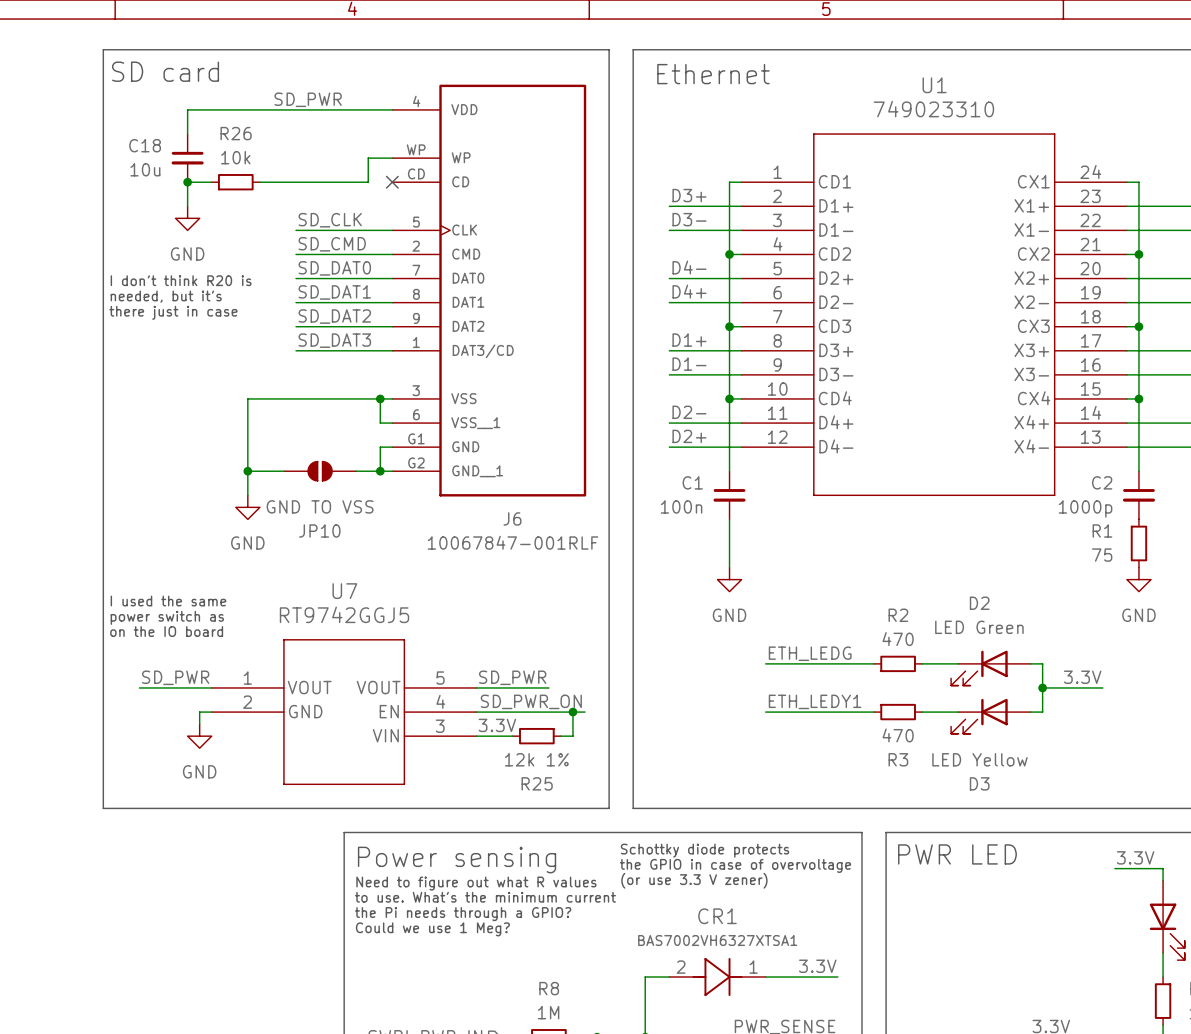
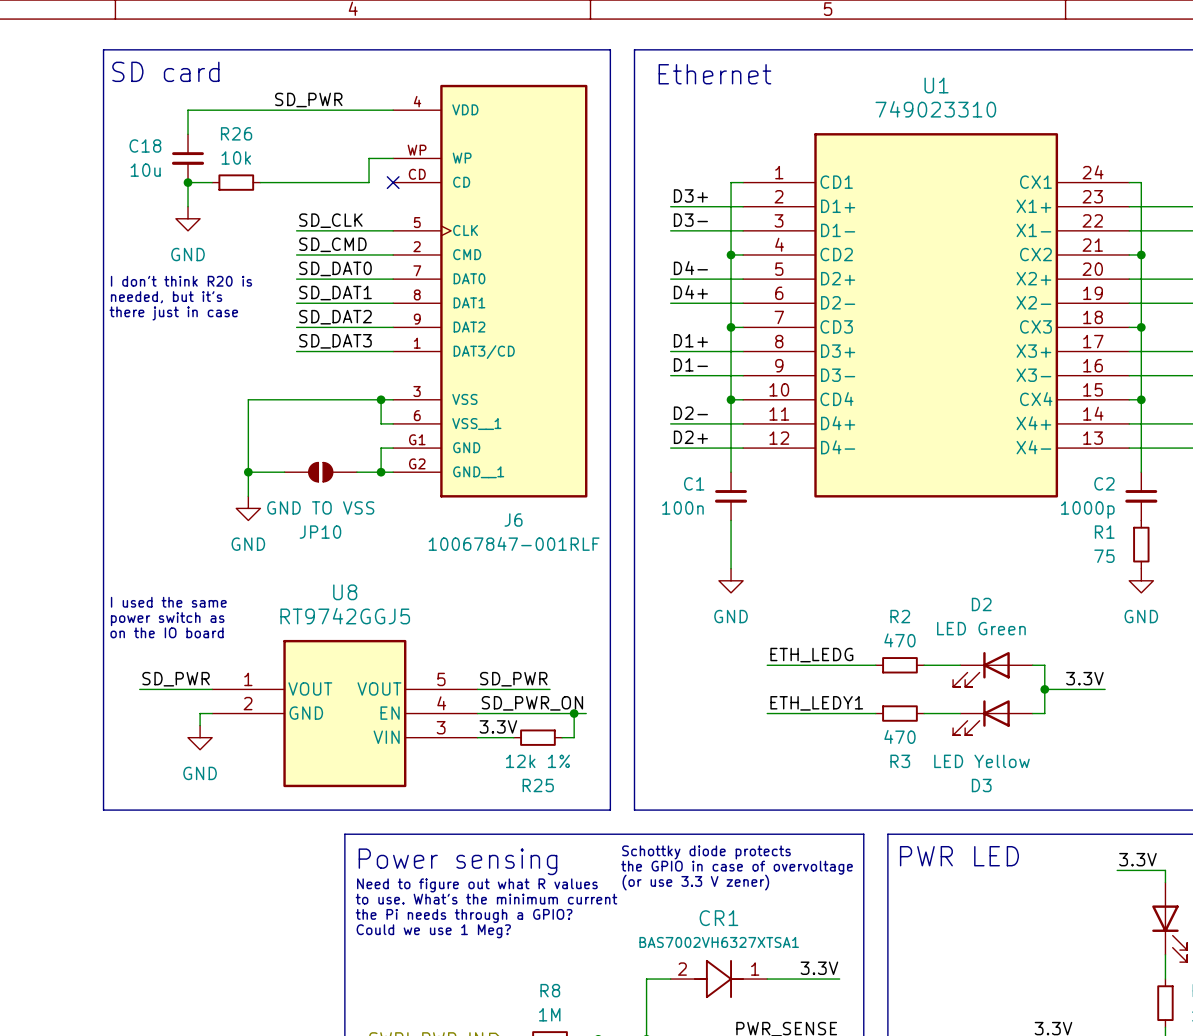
U1 symbol: [741, 133, 1127, 496] -> [743, 133, 1130, 498]
U7: RT9742GGJ5 (344, 712) -> none
U8: none -> RT9742GGJ5 (344, 713)

